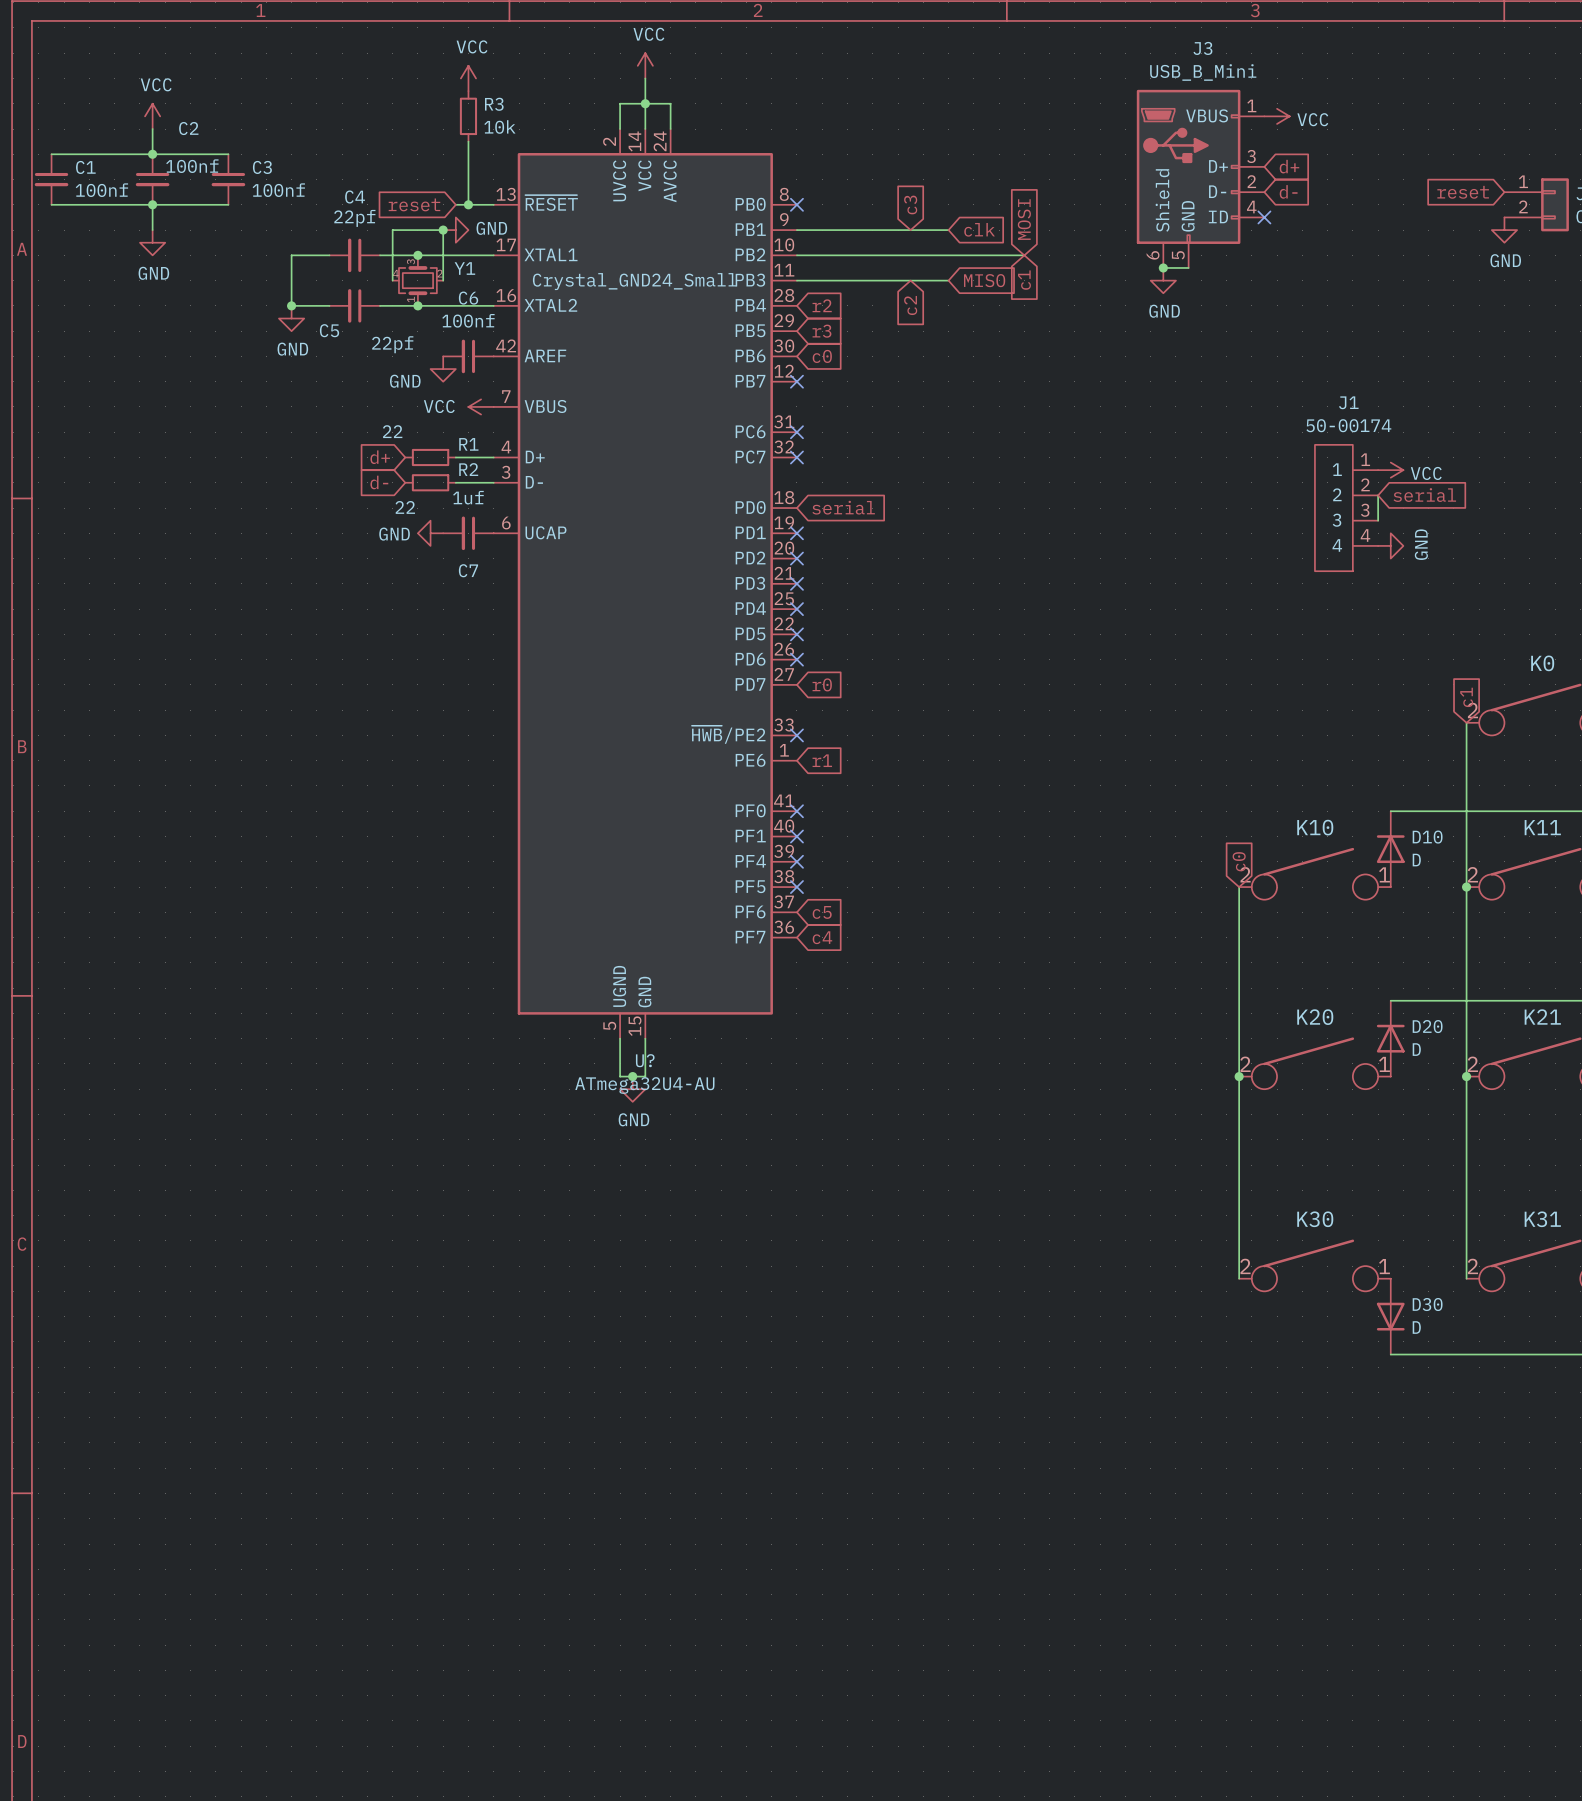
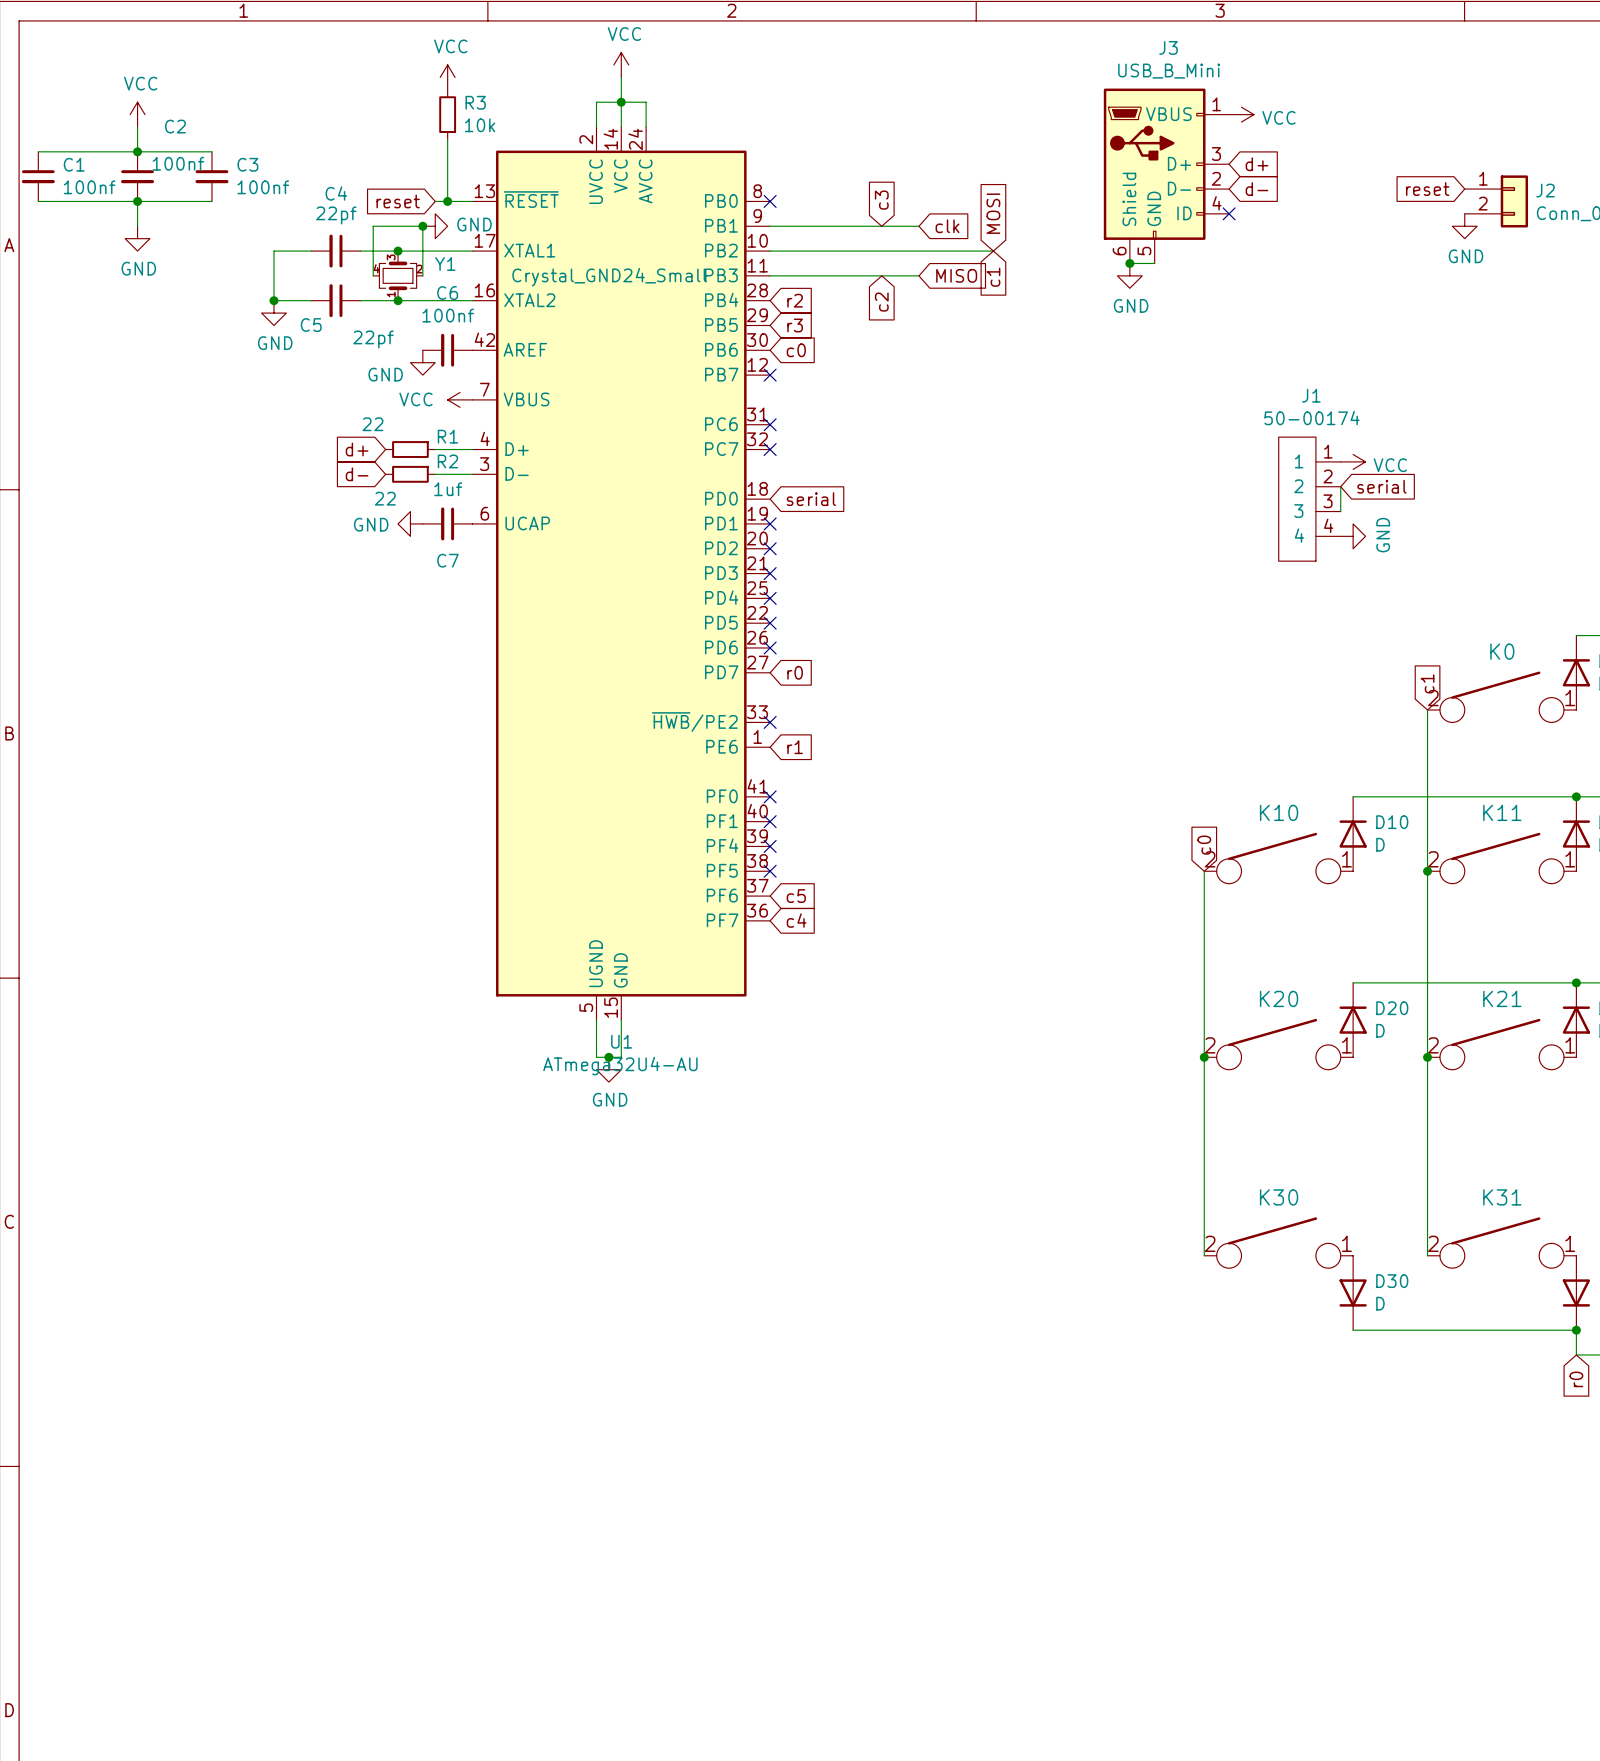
U? name: U? (645, 1060) -> U1 (621, 1041)

